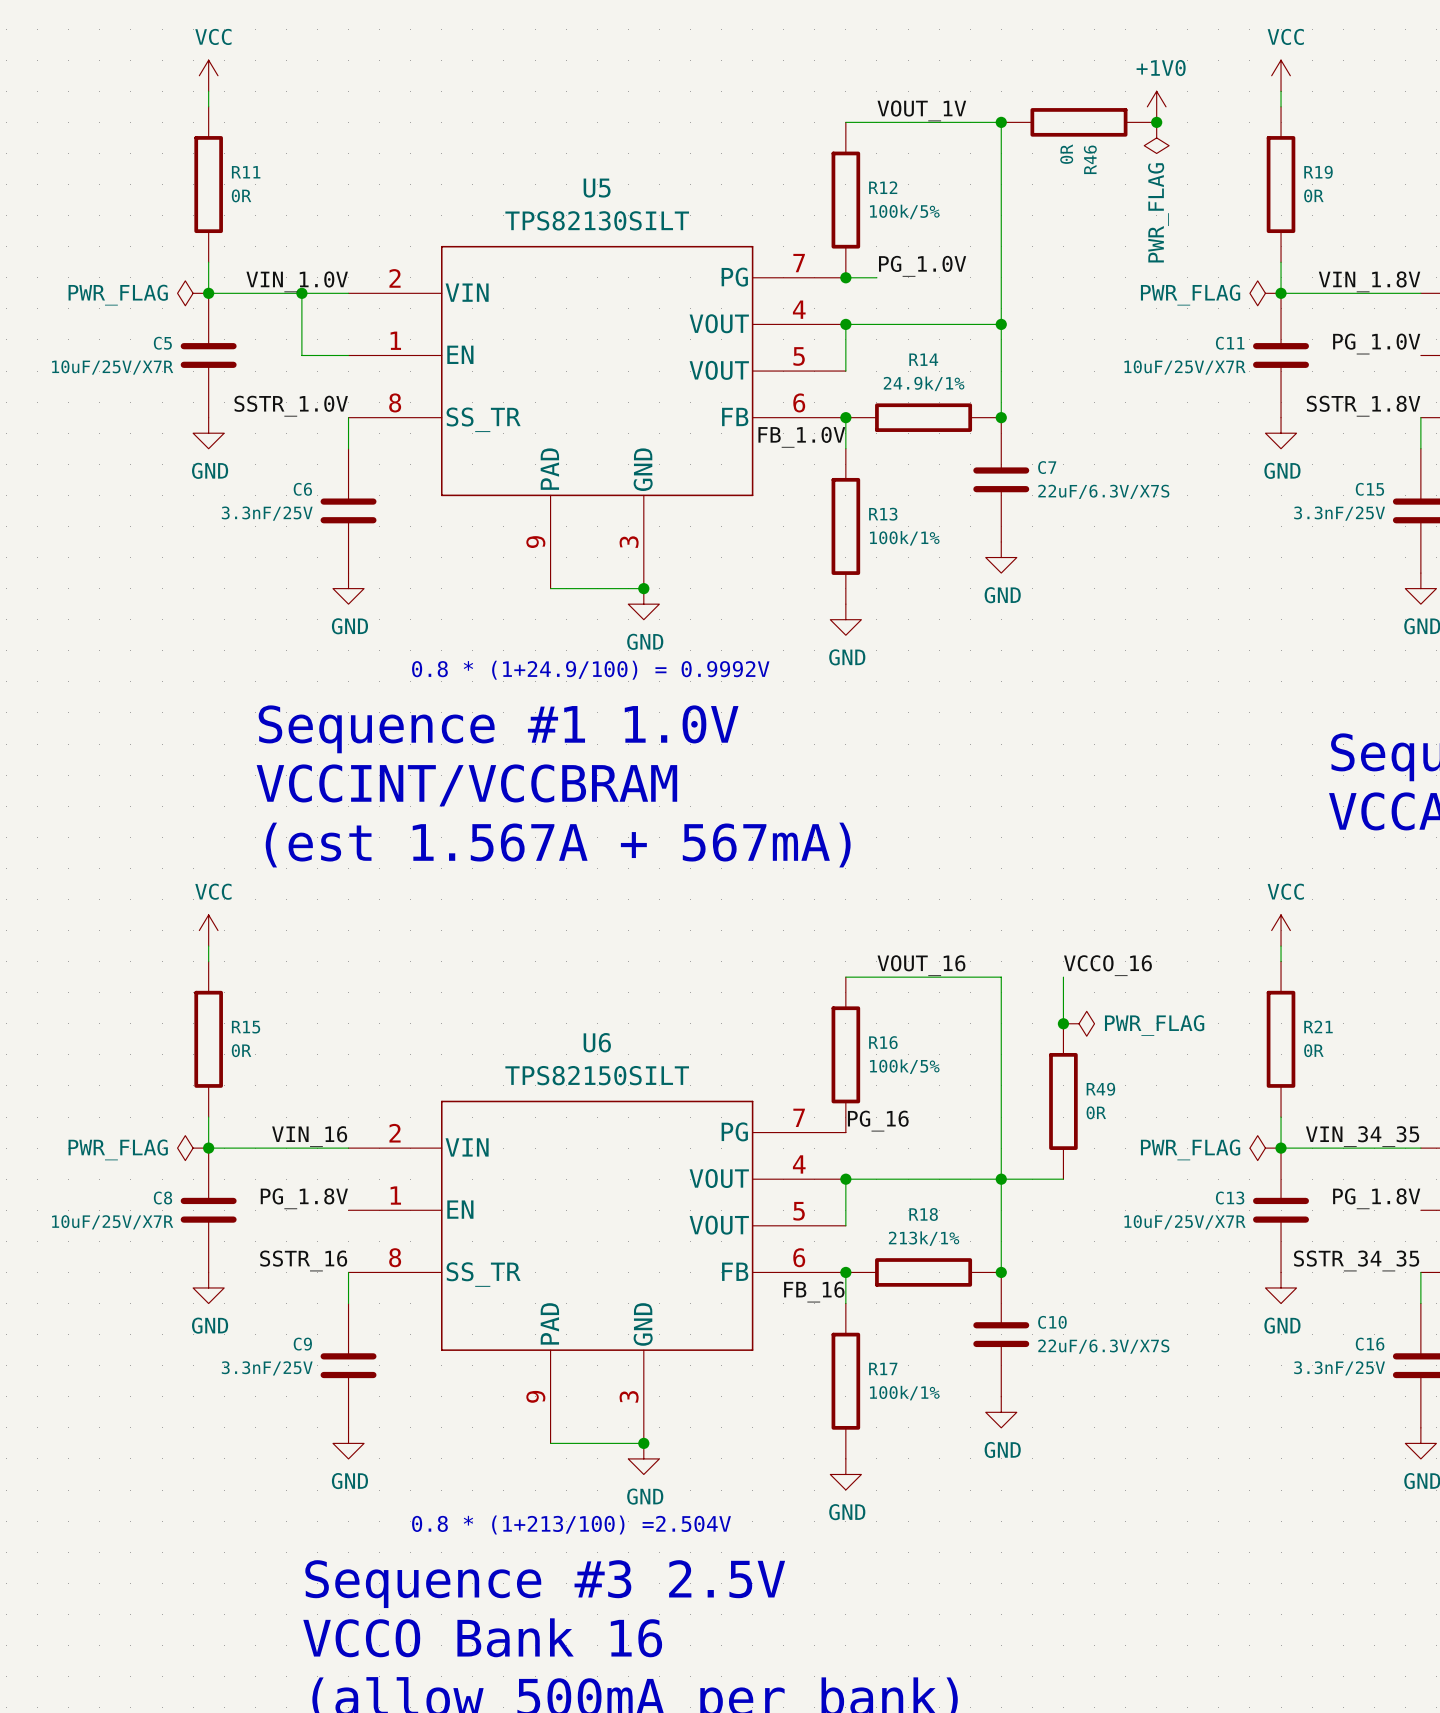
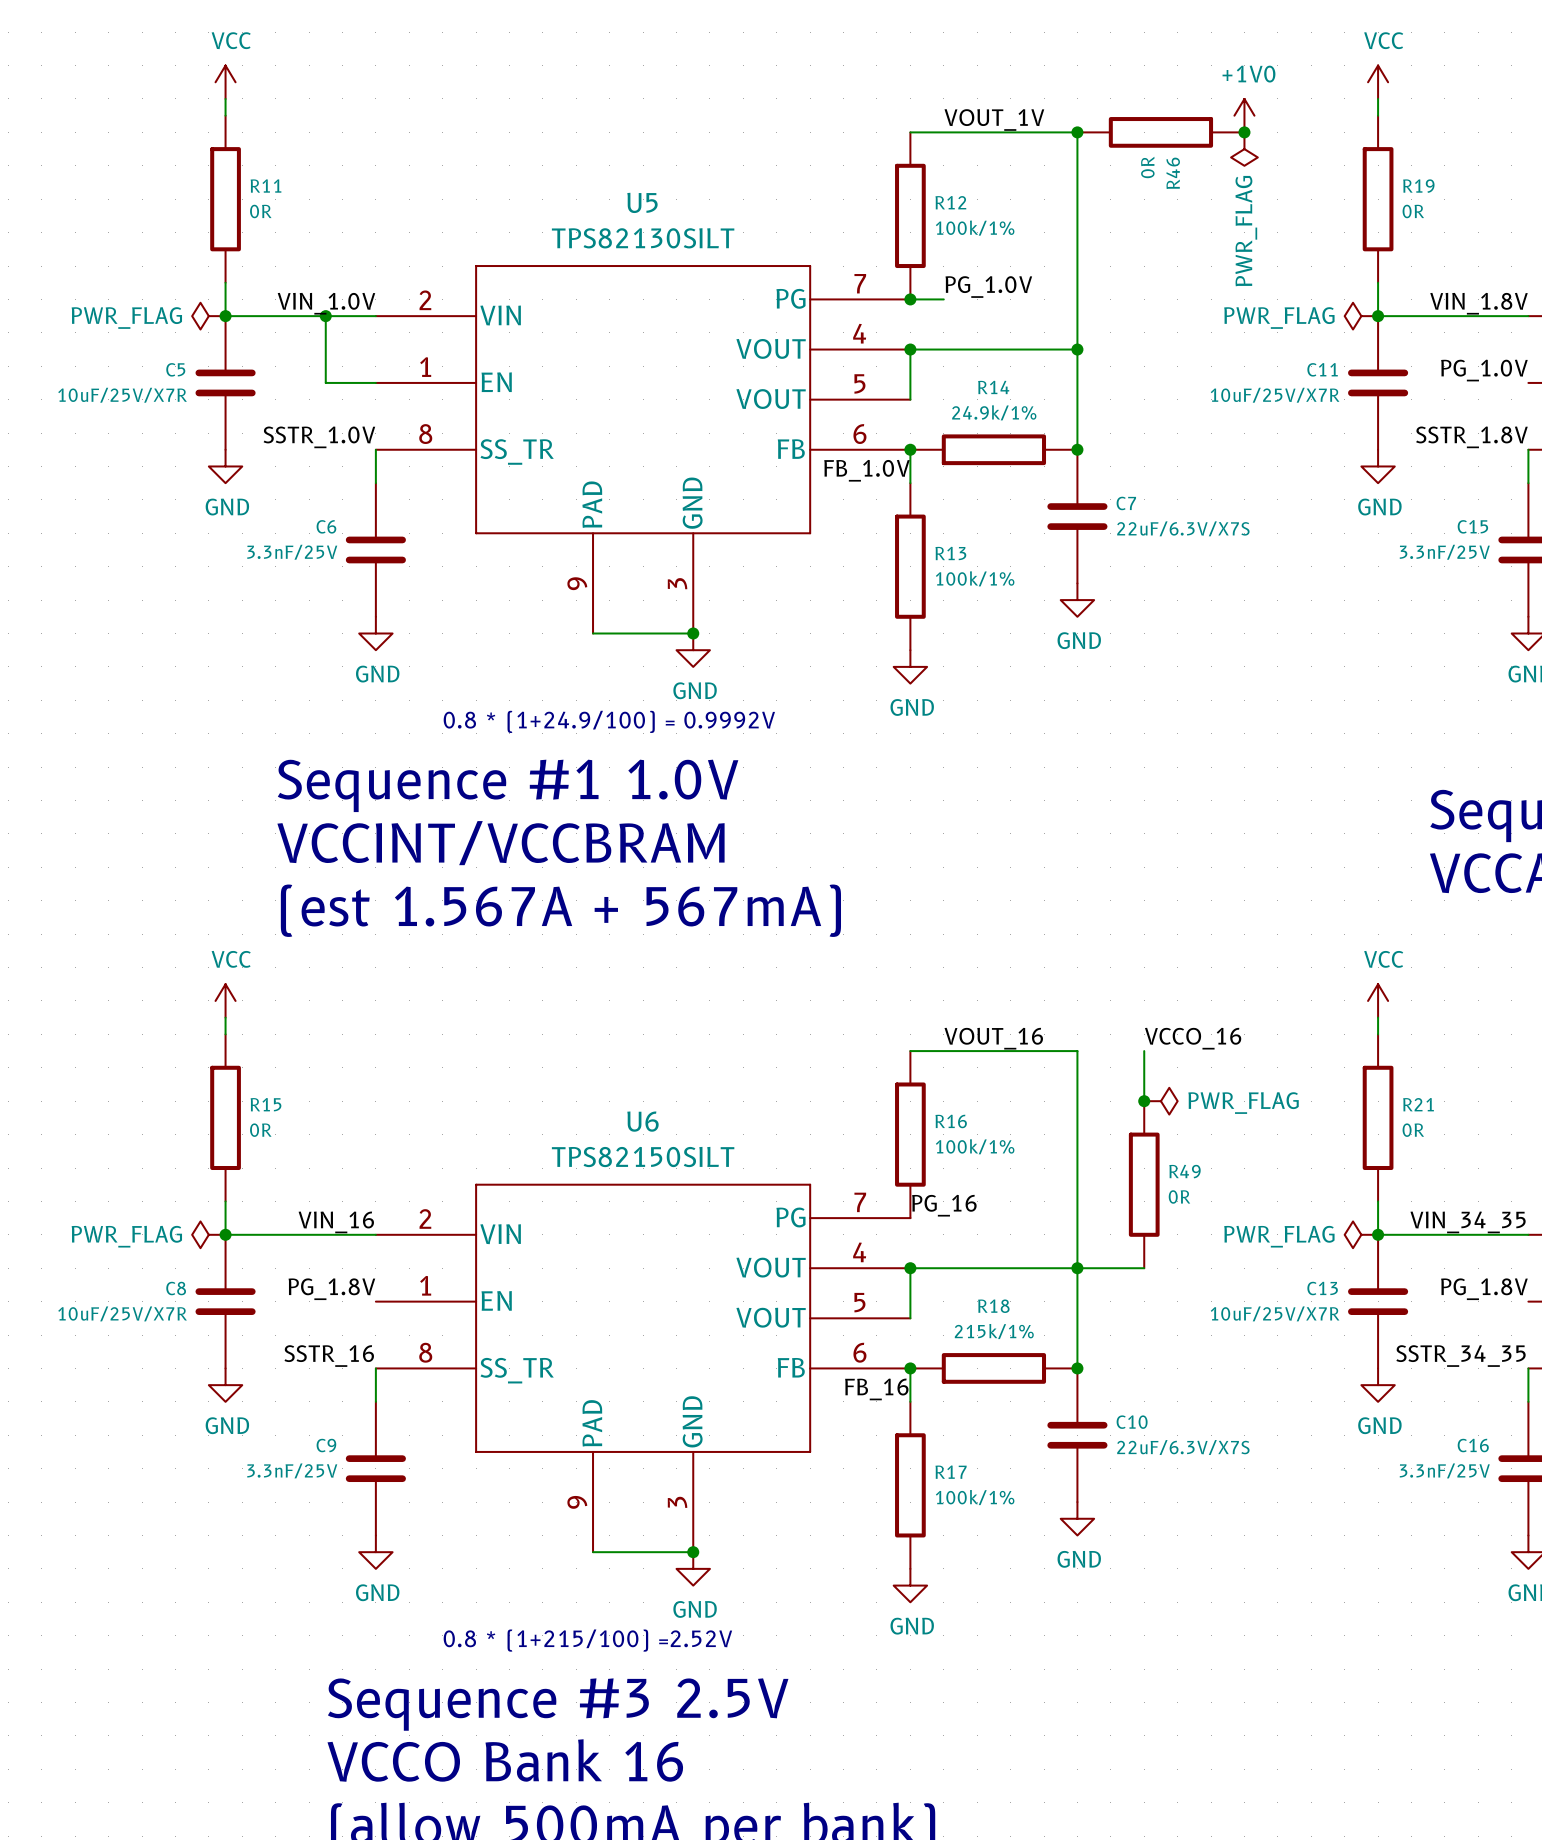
R12 value: 100k/5% (904, 211) -> 100k/1% (975, 228)
R16 value: 100k/5% (904, 1066) -> 100k/1% (975, 1146)
R18 value: 213k/1% (924, 1238) -> 215k/1% (994, 1331)
text: 0.8 * (1+213/100) =2.504V (571, 1525) -> 0.8 * (1+215/100) =2.52V (587, 1640)

